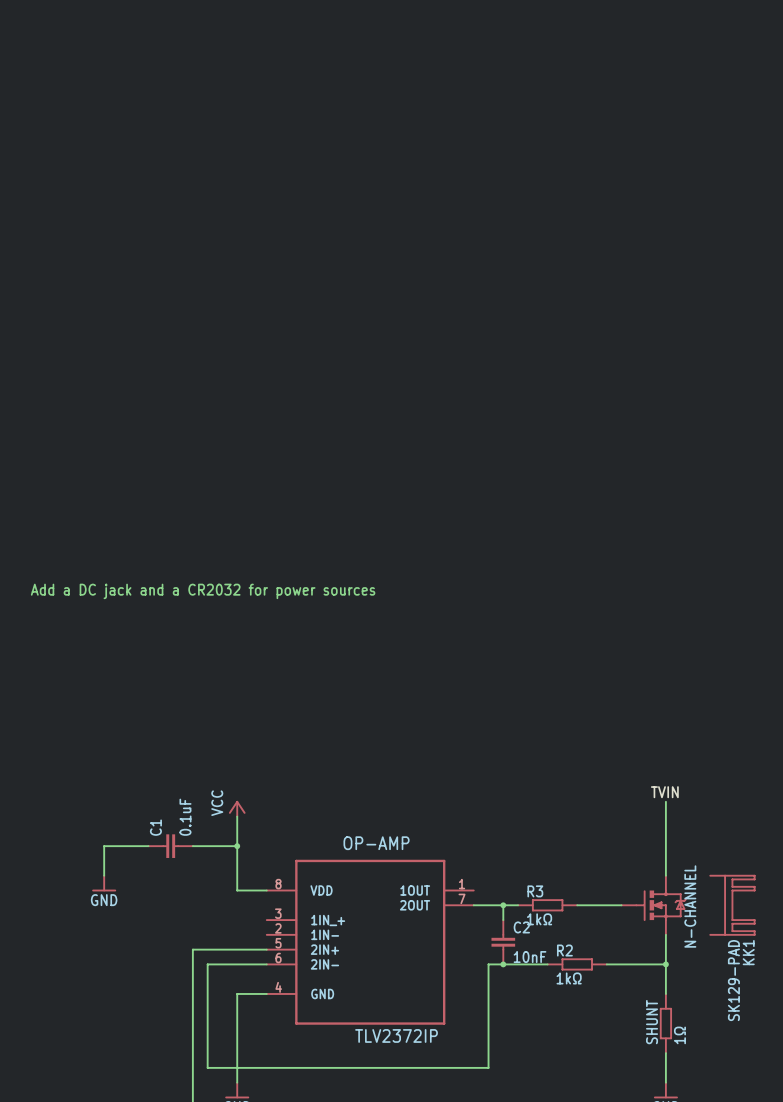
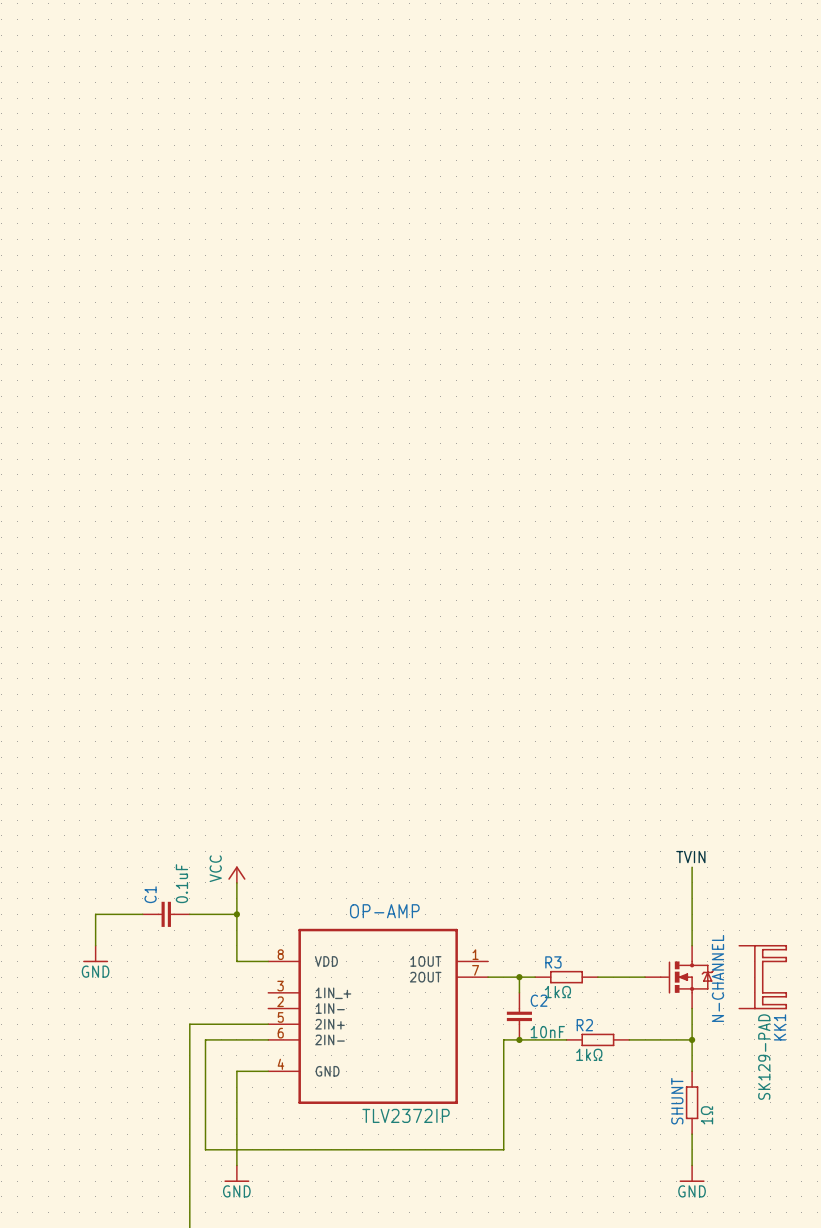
text: Add a DC jack and a CR2032 for power sources (203, 591) -> none

